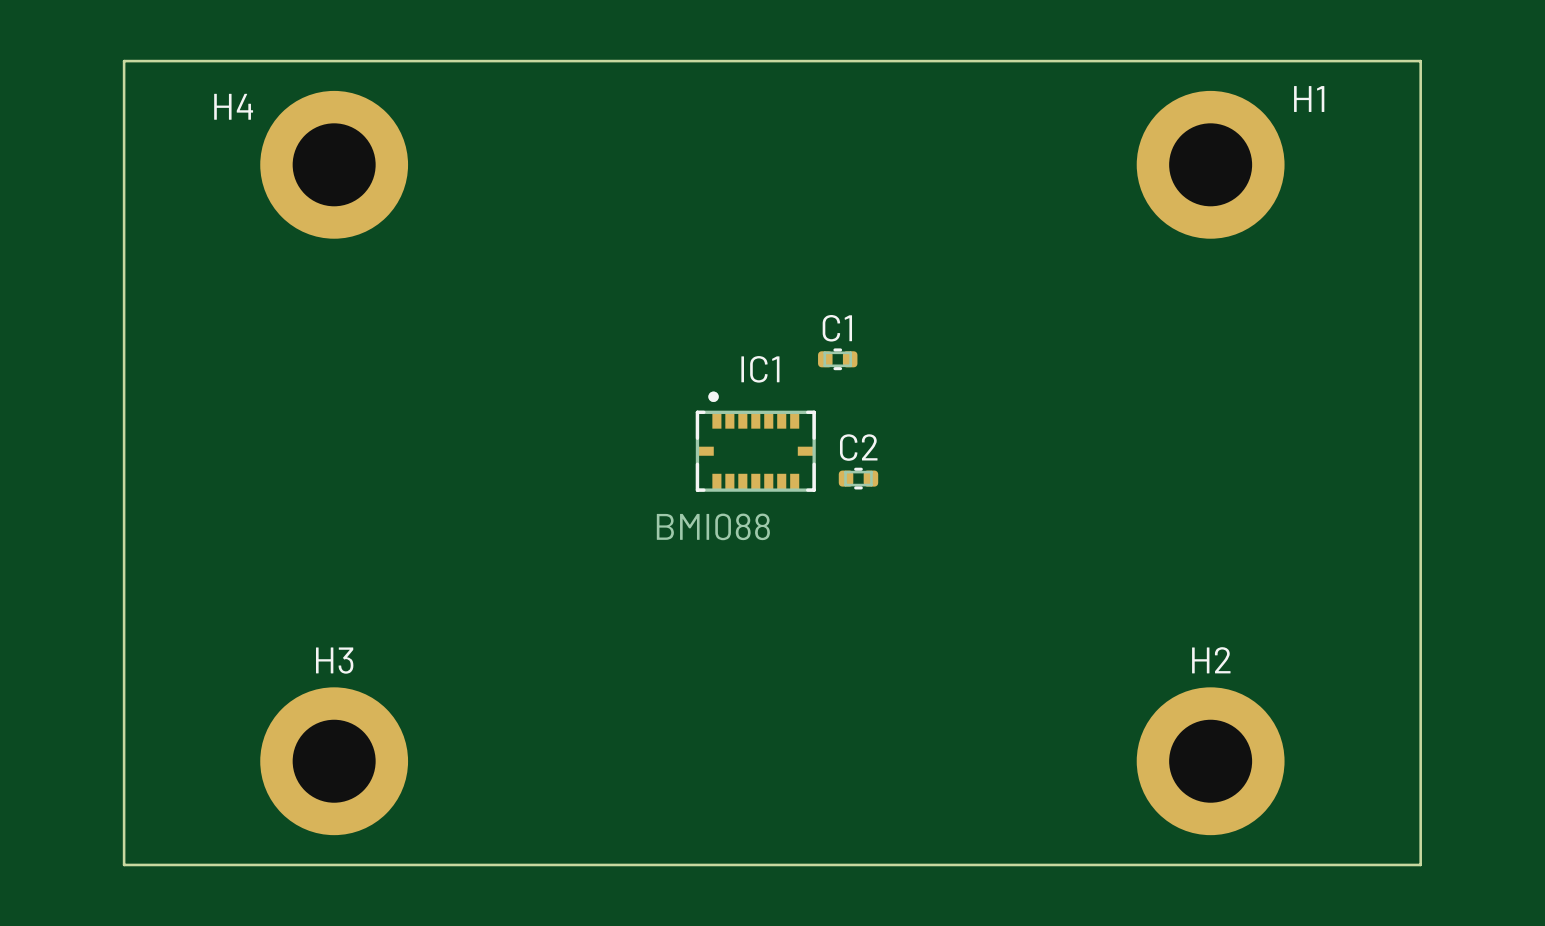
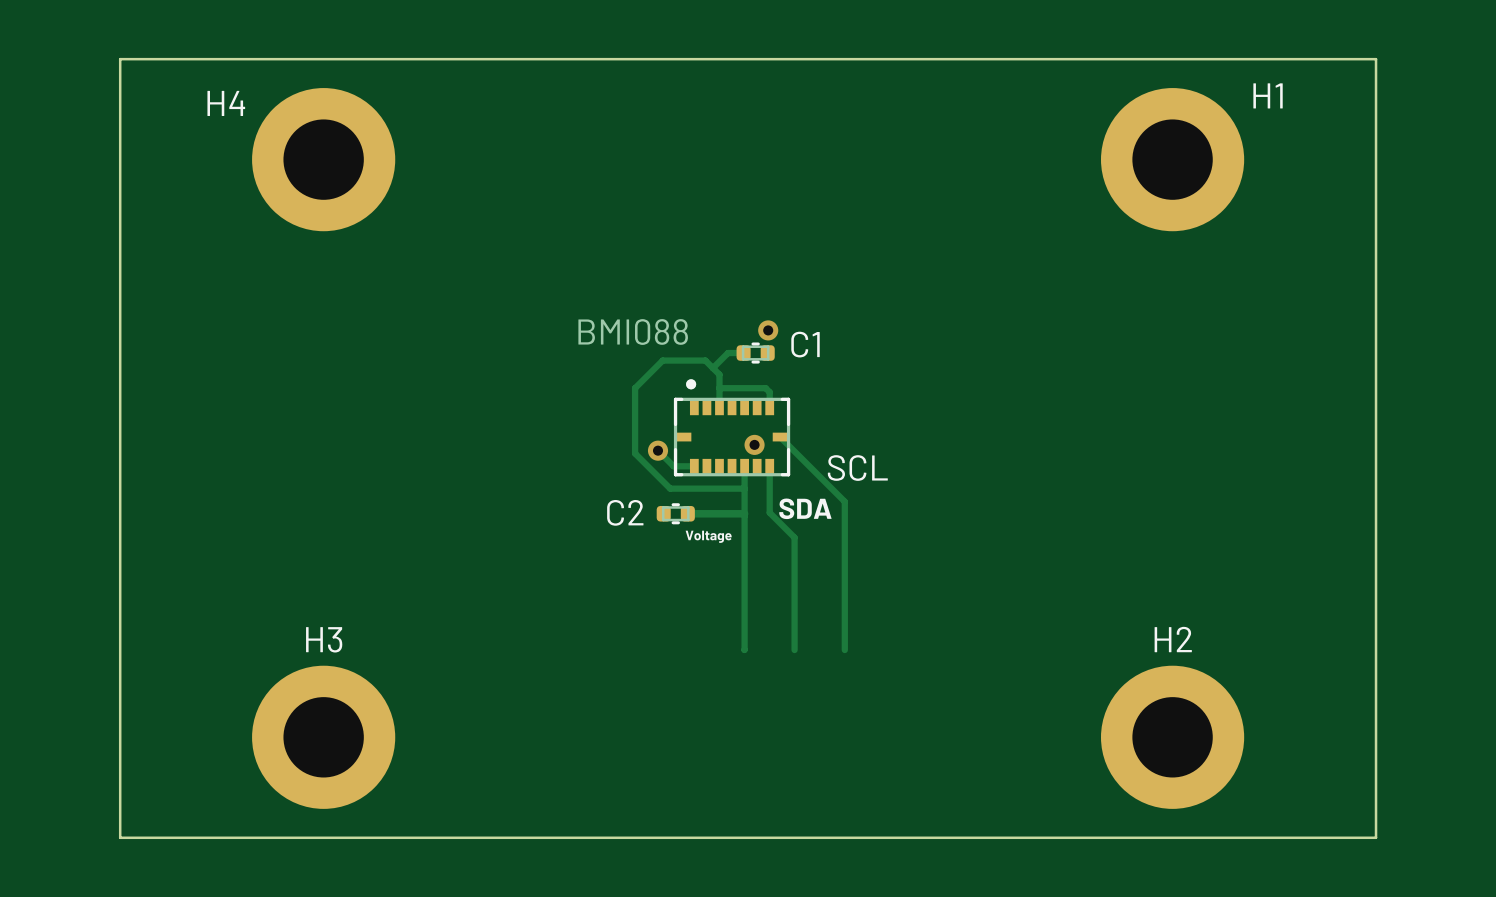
C1 name position: C1 (837, 328) -> C1 (805, 344)
via: none -> (768, 330)
C1 position: (837, 359) -> (755, 353)
track: none -> (743, 353) (728, 353) (712, 368)
IC1 name: IC1 (760, 369) -> none
track: none -> (719, 388) (765, 388) (769, 392) (769, 407)
track: none -> (719, 407) (719, 374) (705, 360) (662, 360) (635, 388) (635, 453) (670, 488) (744, 488)
C2 name position: C2 (858, 447) -> C2 (625, 512)
track: none -> (780, 437) (844, 501) (844, 650)
via: none -> (754, 444)
track: none -> (658, 450) (673, 466) (694, 466)
via: none -> (658, 450)
C2 position: (858, 478) -> (675, 513)
track: none -> (744, 466) (744, 649)
track: none -> (769, 466) (769, 512) (794, 537) (794, 650)
text: none -> SCL (857, 468)
text: none -> SDA (805, 508)
IC1 value position: BMI088 (713, 526) -> BMI088 (633, 331)
track: none -> (687, 513) (744, 513)
text: none -> Voltage (708, 536)

